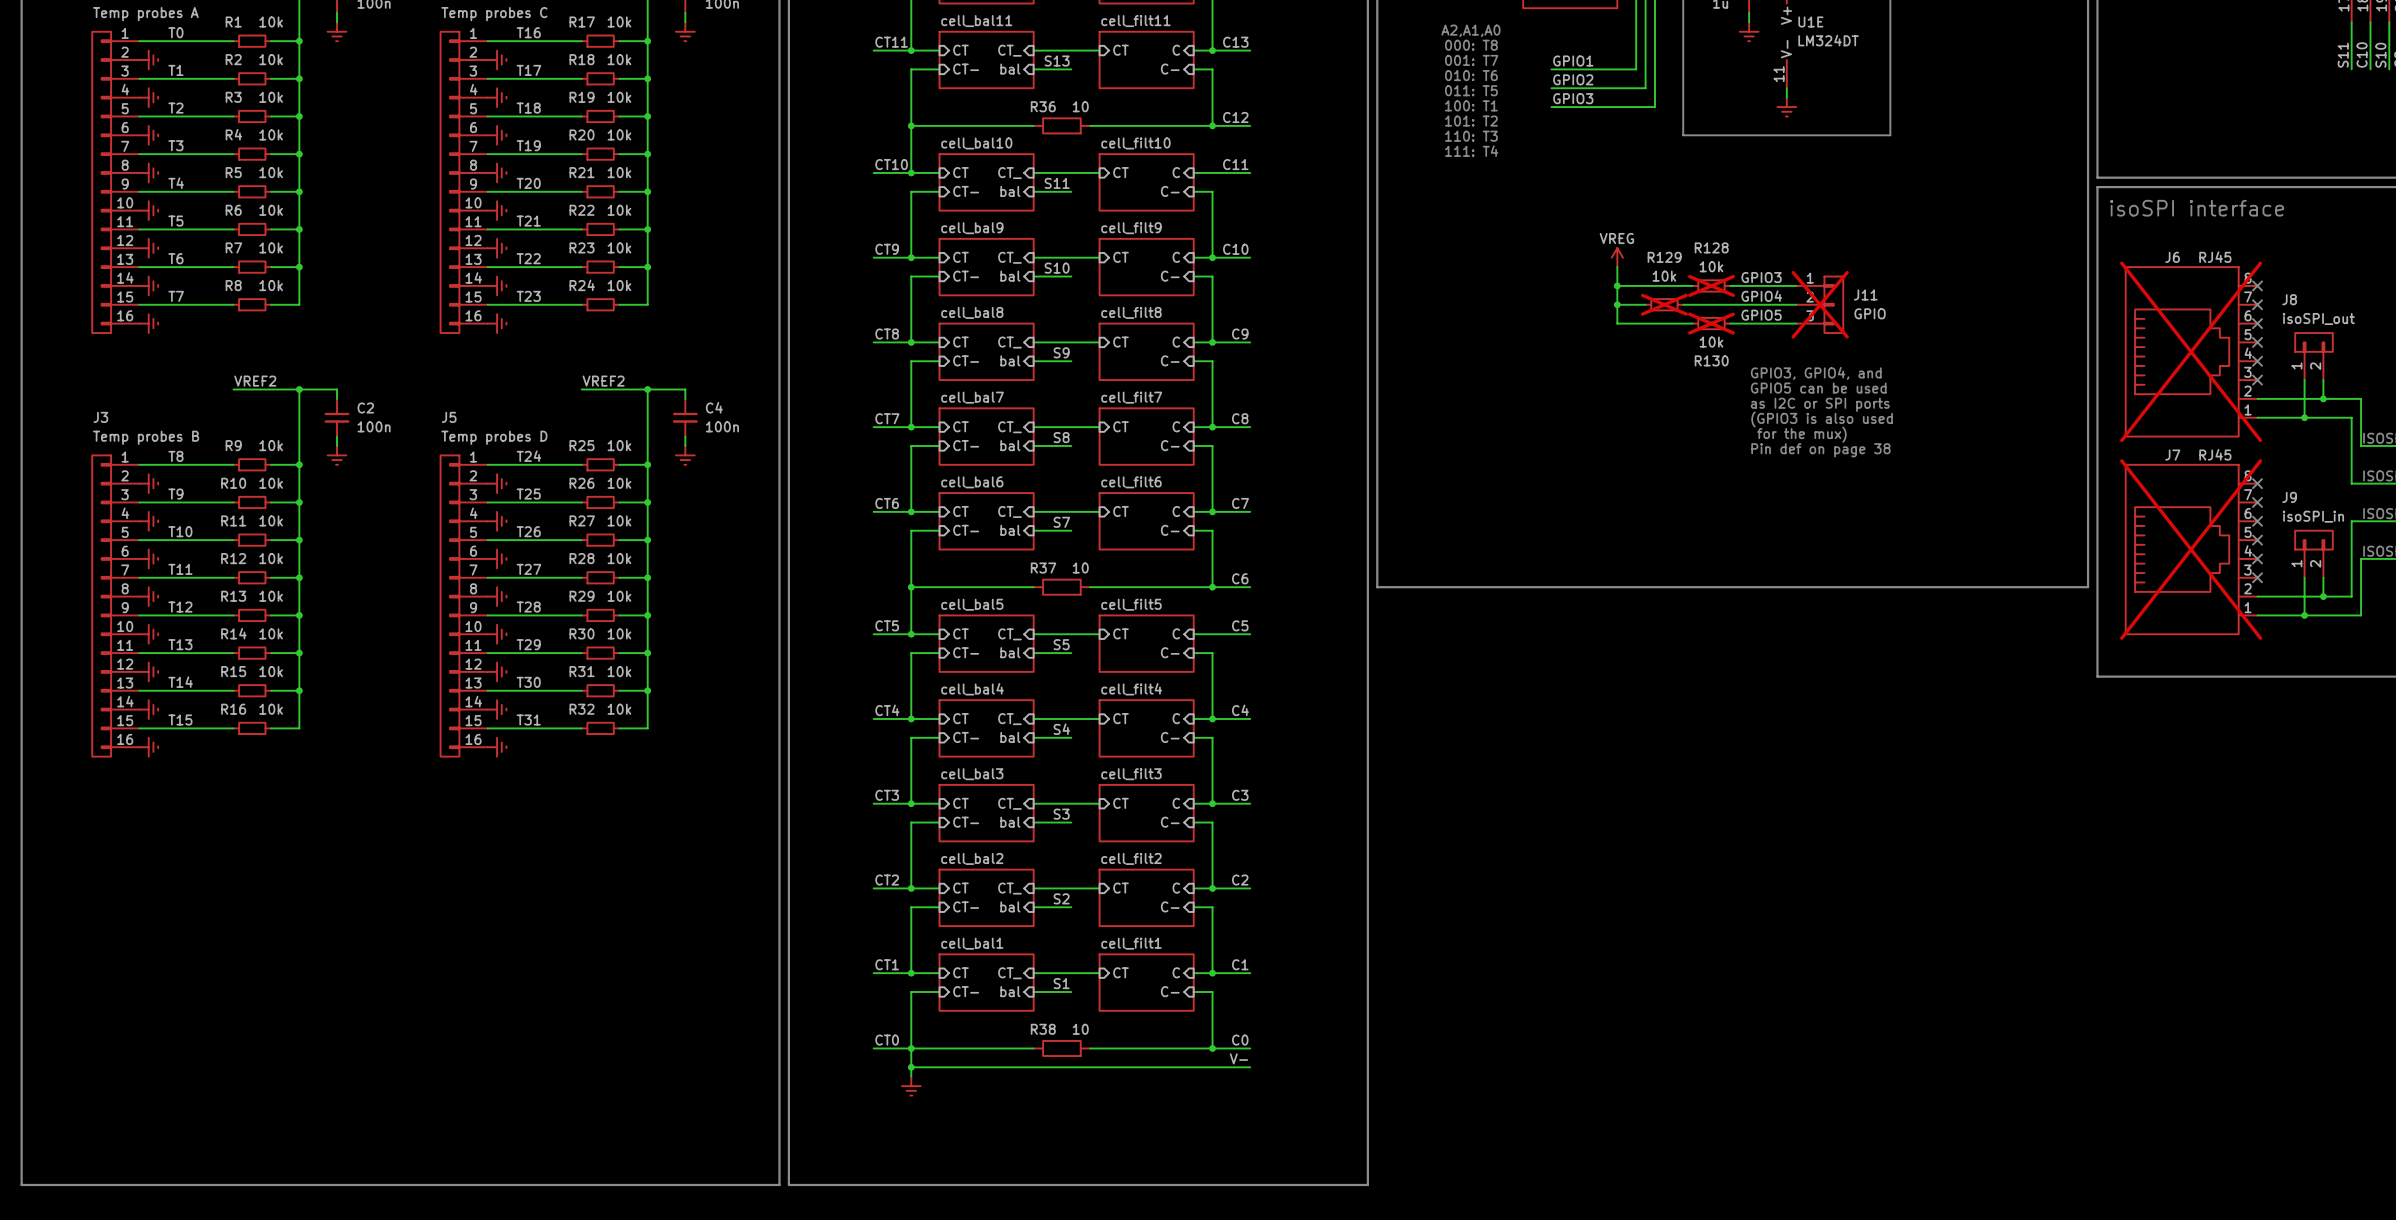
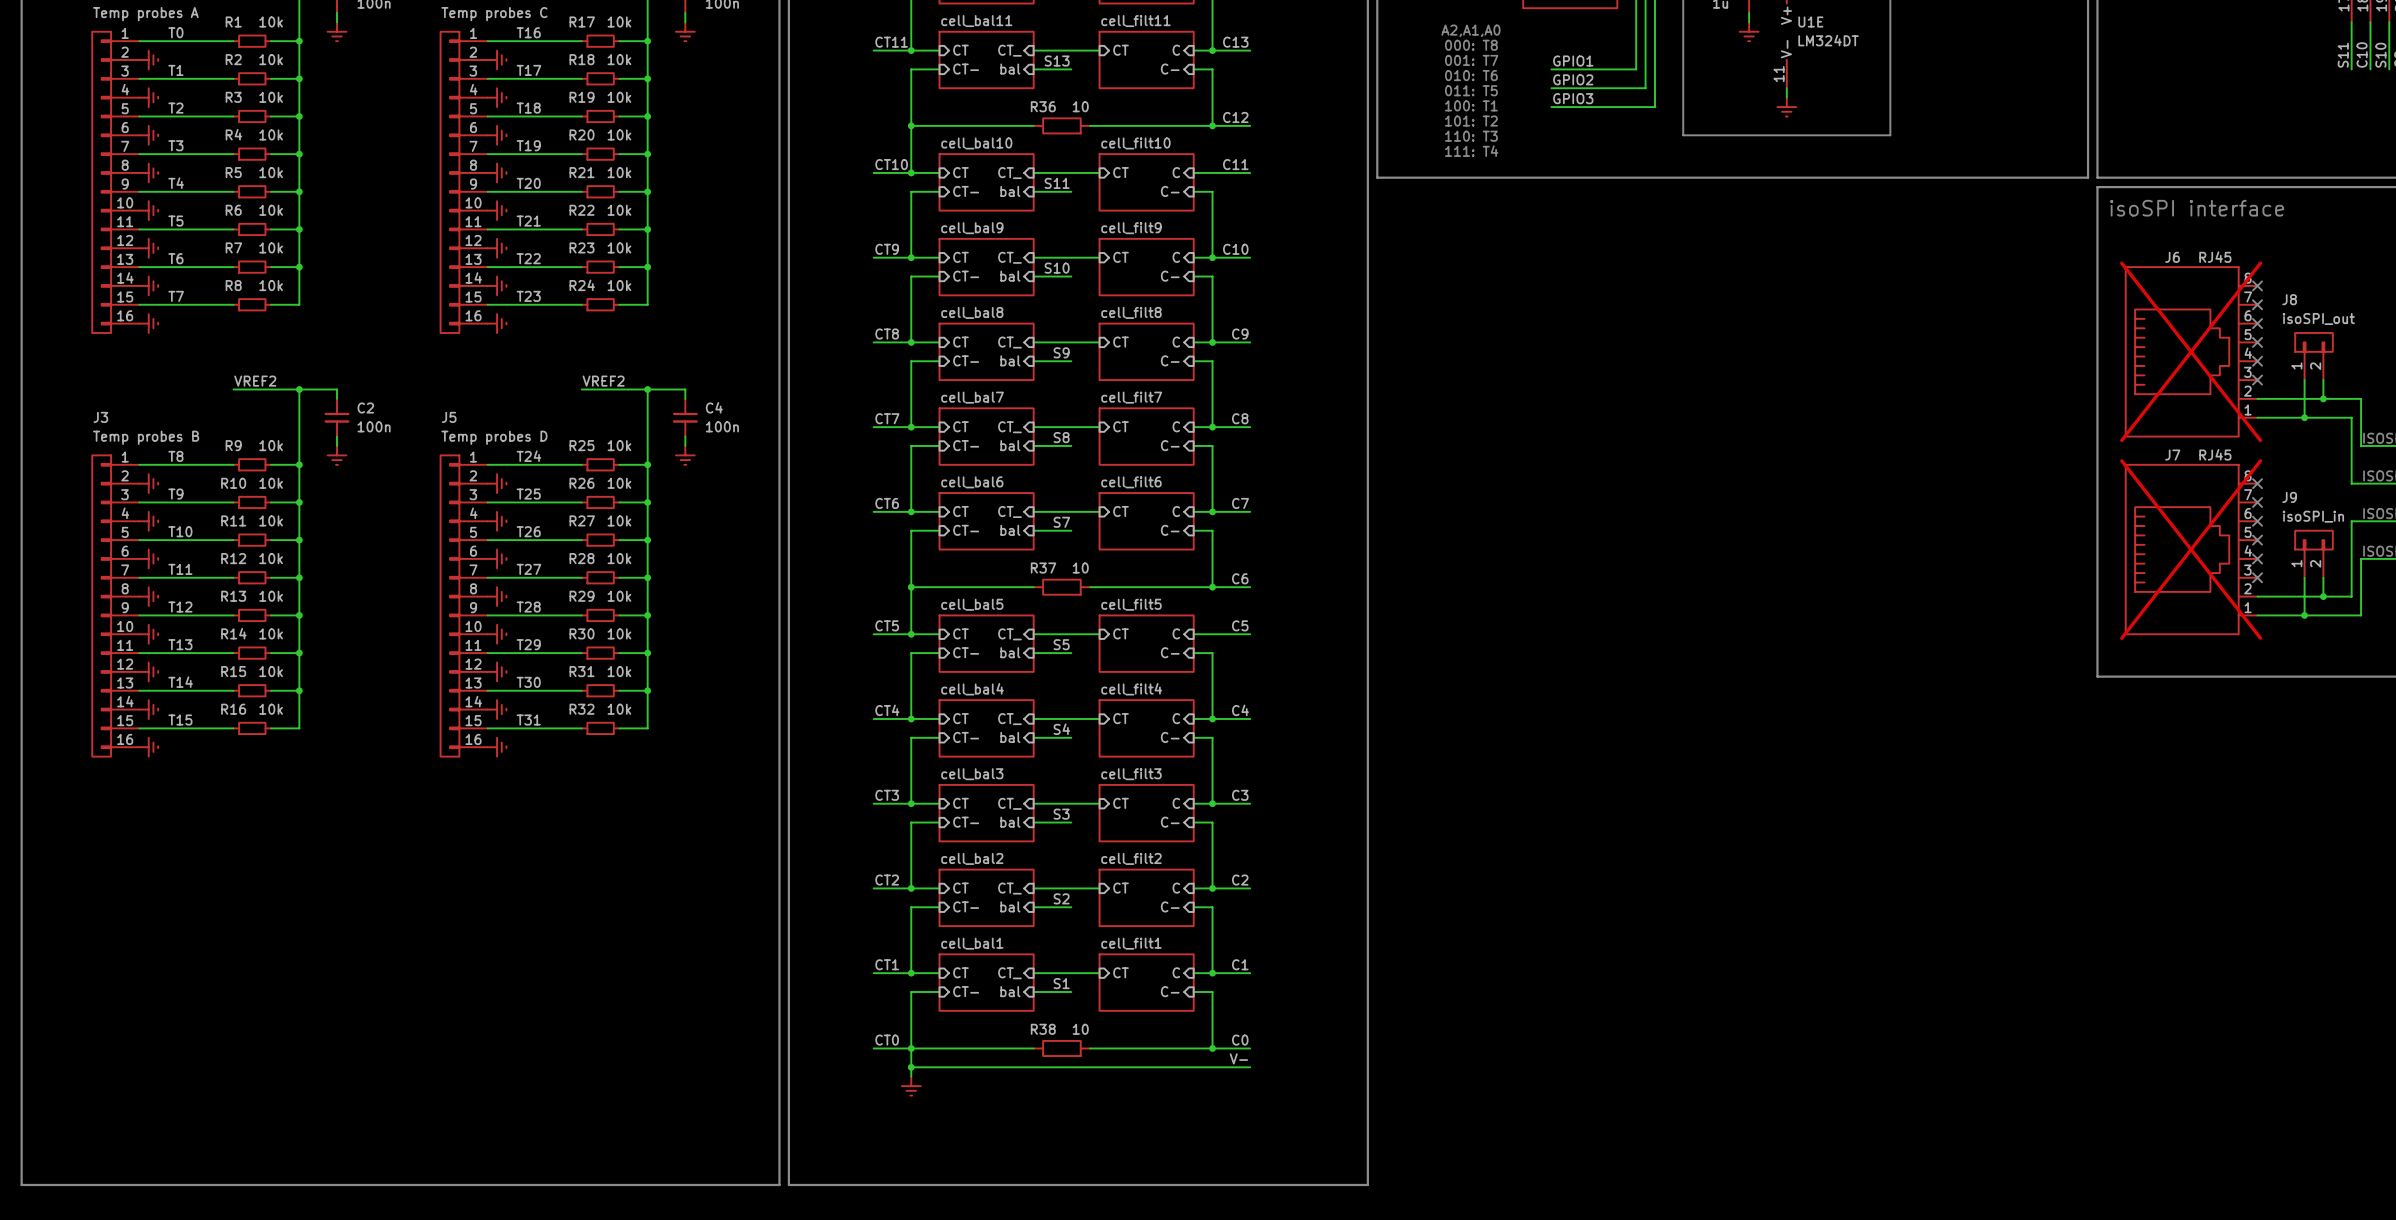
line: (1377, 177) (1377, 587) (2088, 587) (2088, 177) -> (1377, 177) (2088, 177)
power symbol: VREG (1617, 257) -> none
wire: (1617, 267) (1617, 323) (1692, 323) -> none
label: GPIO3 (1761, 277) -> none
wire: (1617, 285) (1692, 285) -> none
junction: (1617, 285) -> none
R128: 10k (1711, 285) -> none
wire: (1730, 285) (1796, 285) -> none
label: GPIO4 (1761, 296) -> none
wire: (1617, 304) (1645, 304) -> none
junction: (1617, 304) -> none
R129: 10k (1664, 304) -> none
wire: (1683, 304) (1796, 304) -> none
J11: GPIO (1820, 304) -> none
label: GPIO5 (1761, 315) -> none
R130: 10k (1711, 323) -> none
wire: (1730, 323) (1796, 323) -> none
text: GPIO3, GPIO4, and (1816, 373) -> none
text: GPIO5 can be used (1818, 388) -> none
text: as I2C or SPI ports (1820, 404) -> none
text: (GPIO3 is also used (1822, 419) -> none
text: for the mux) (1801, 434) -> none
text: Pin def on page 38 (1820, 450) -> none

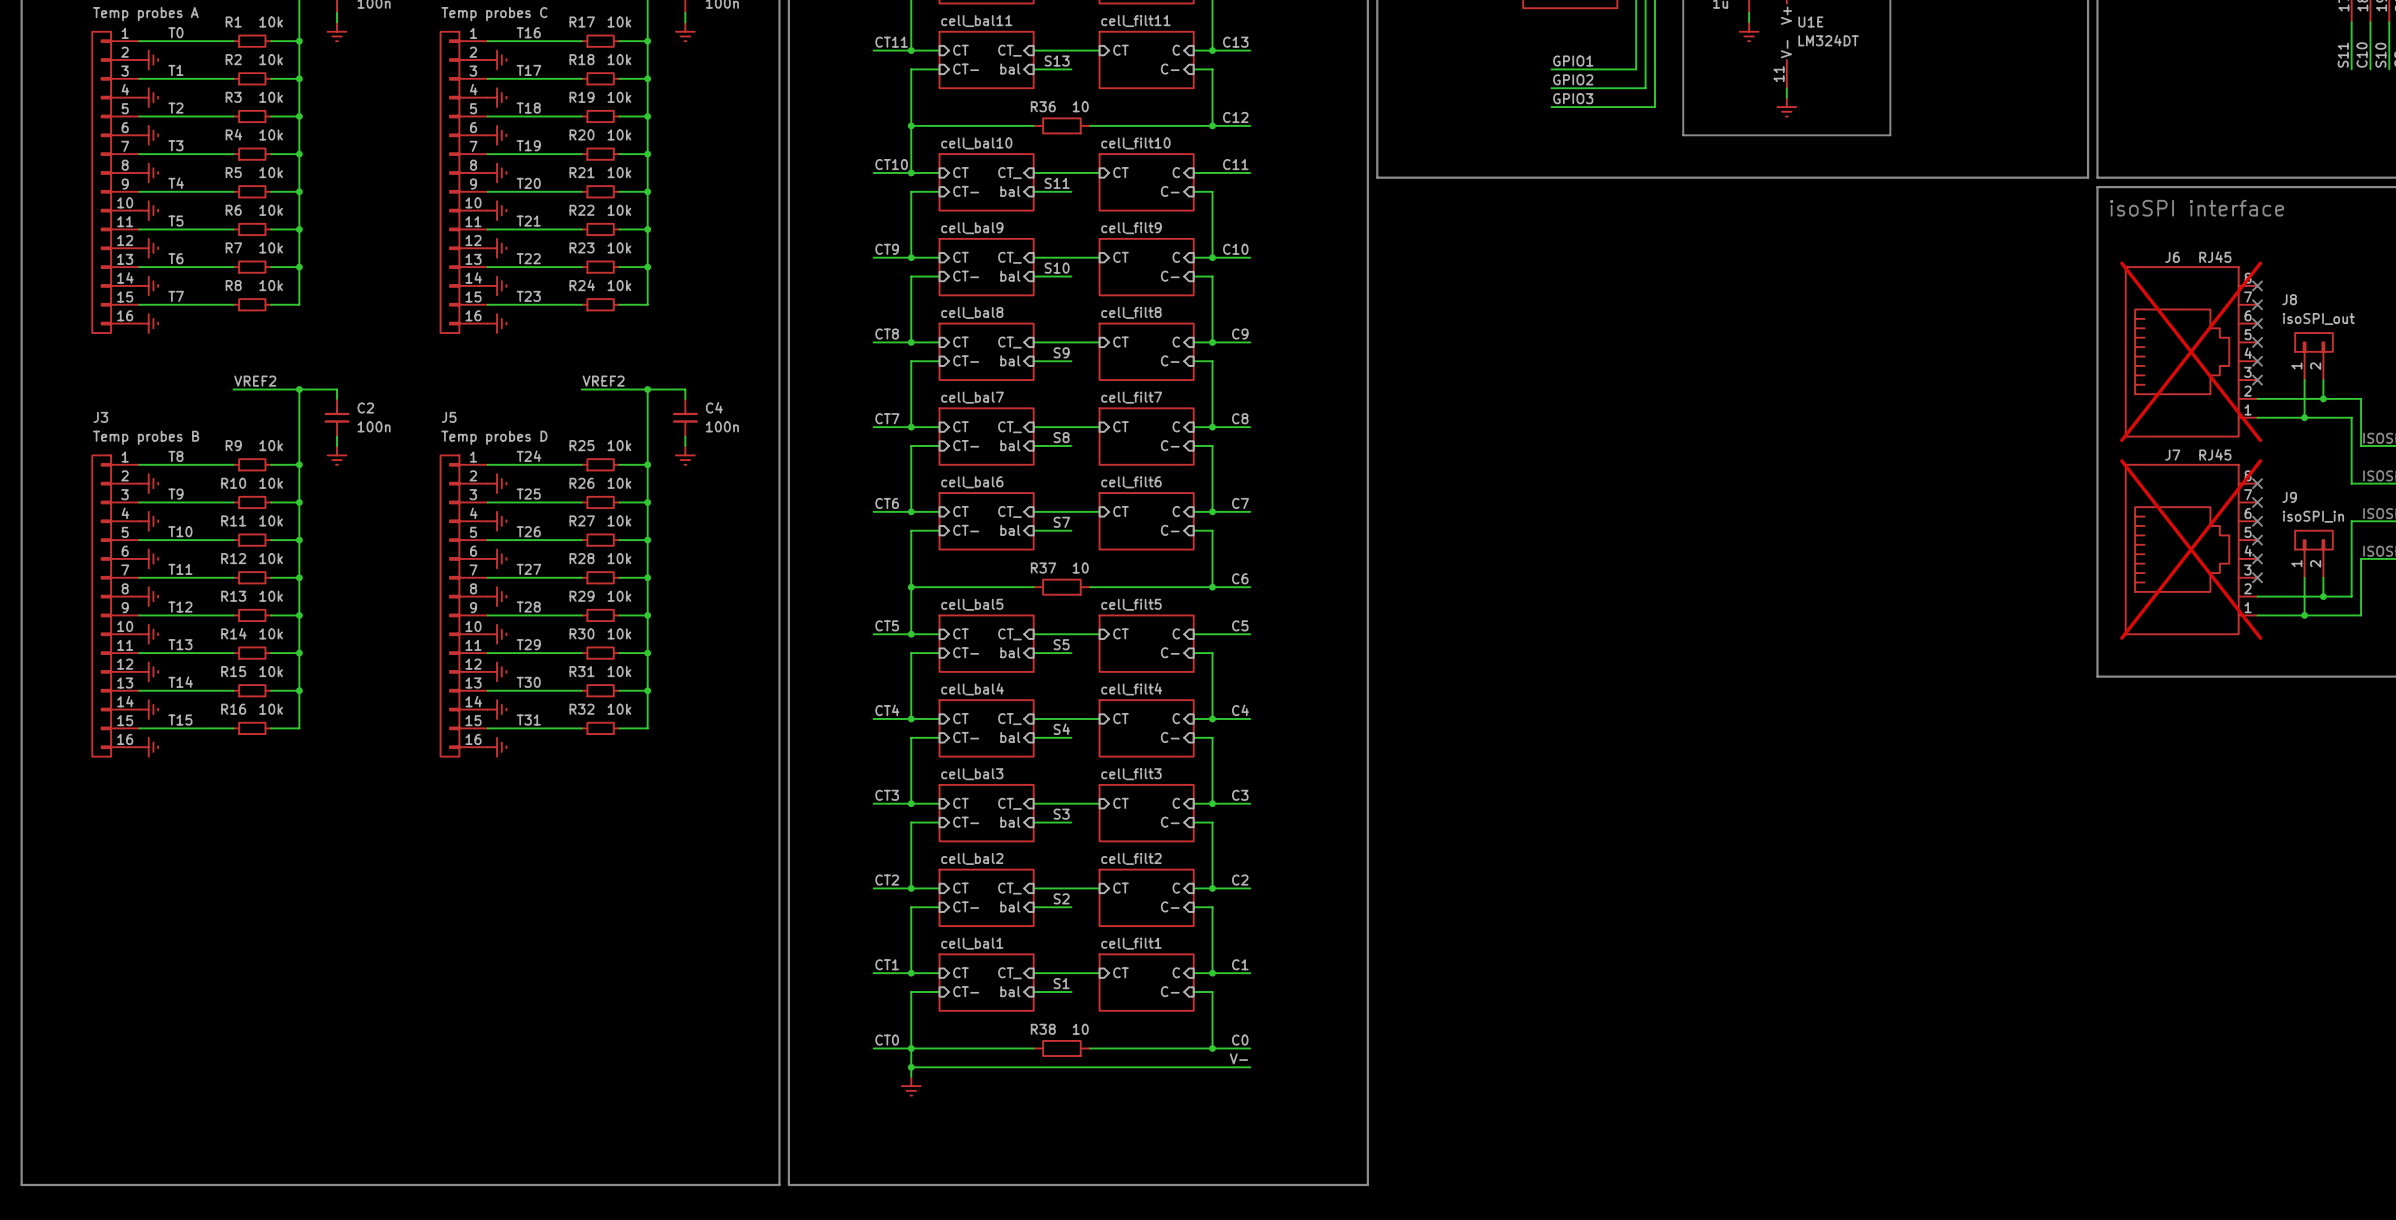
text: A2,A1,A0 (1470, 30) -> none
text: 000: T8 (1471, 45) -> none
text: 001: T7 (1471, 60) -> none
text: 010: T6 (1471, 75) -> none
text: 011: T5 (1471, 90) -> none
text: 100: T1 (1471, 105) -> none
text: 101: T2 (1471, 121) -> none
text: 110: T3 (1471, 136) -> none
text: 111: T4 (1471, 151) -> none

